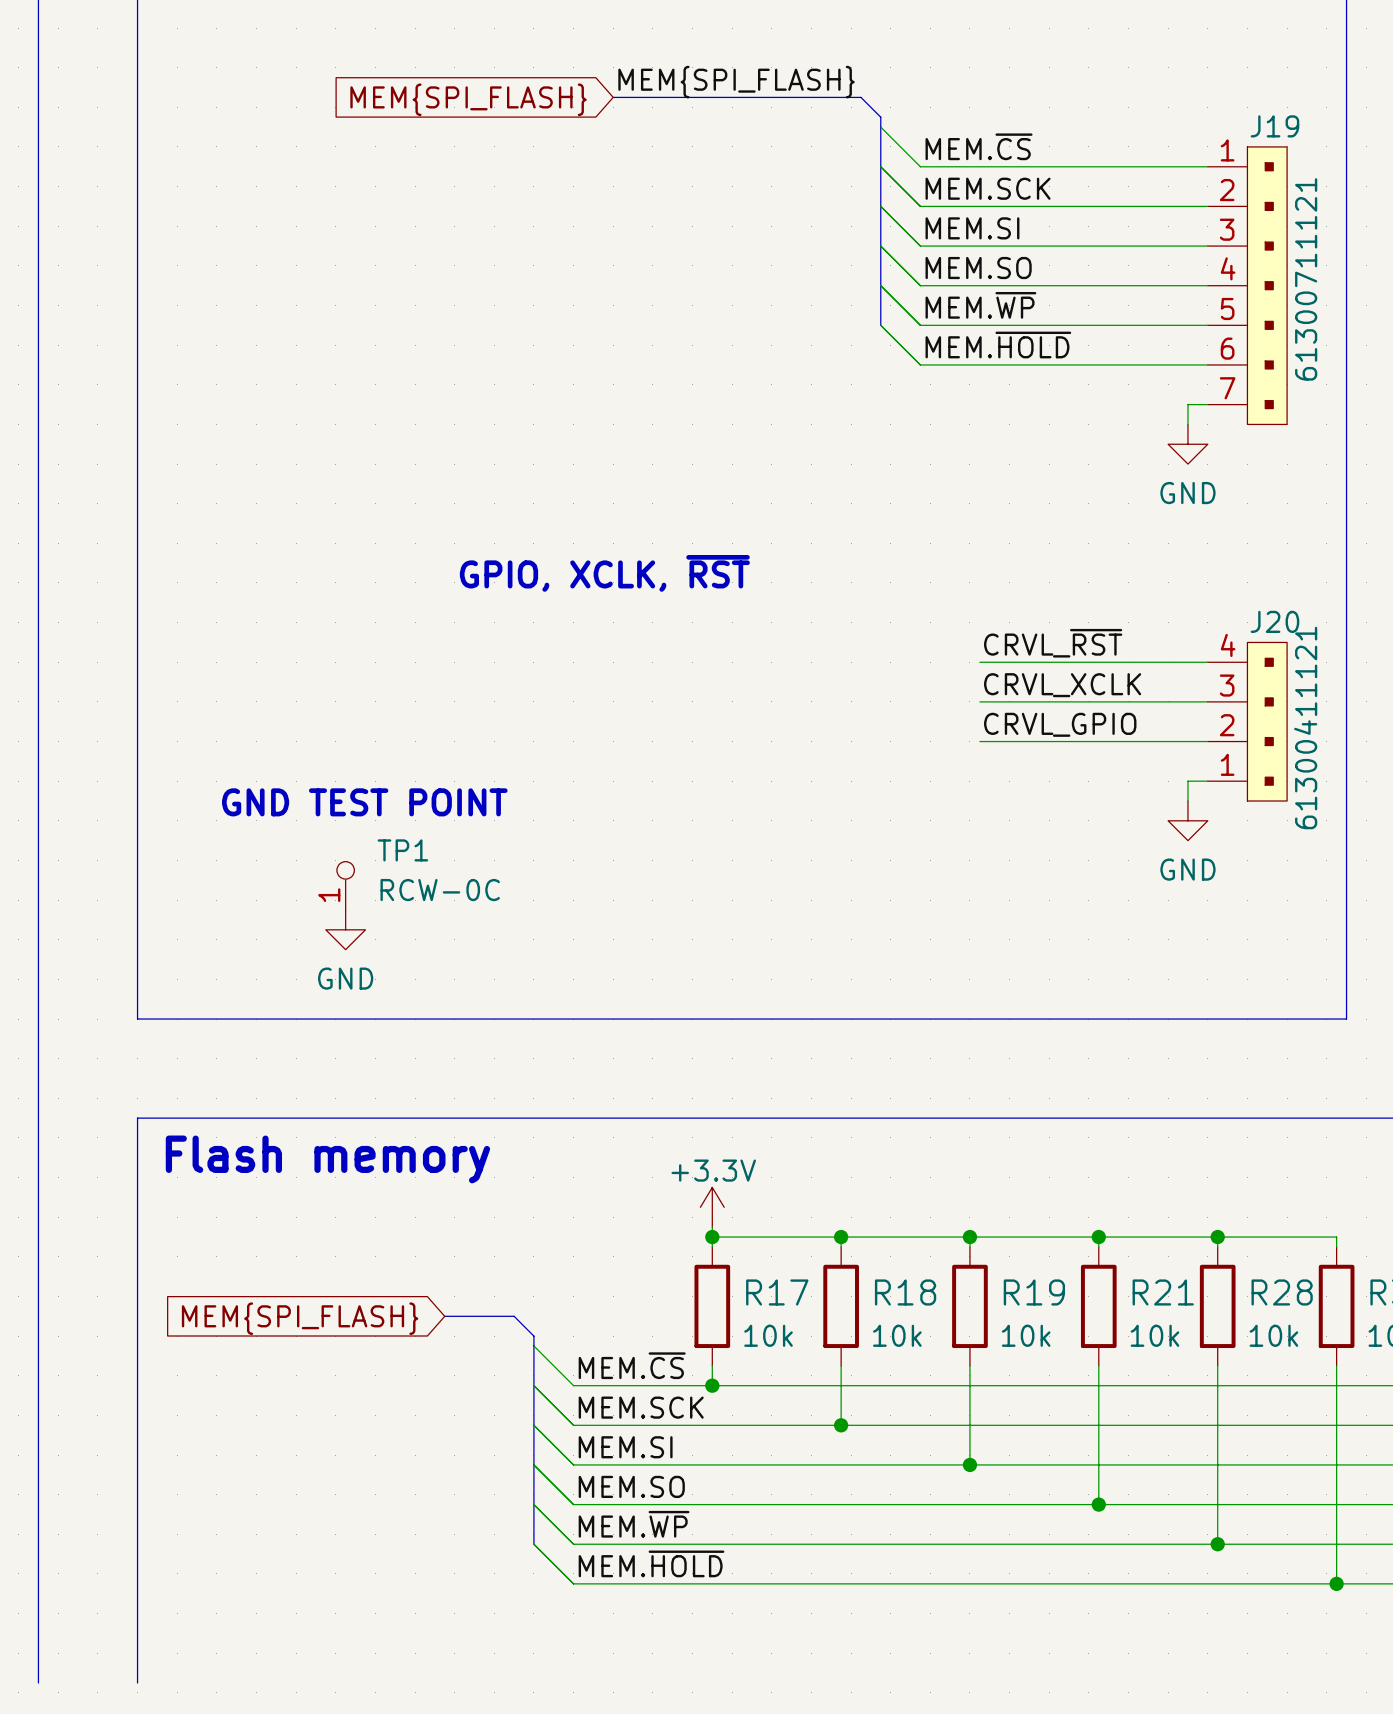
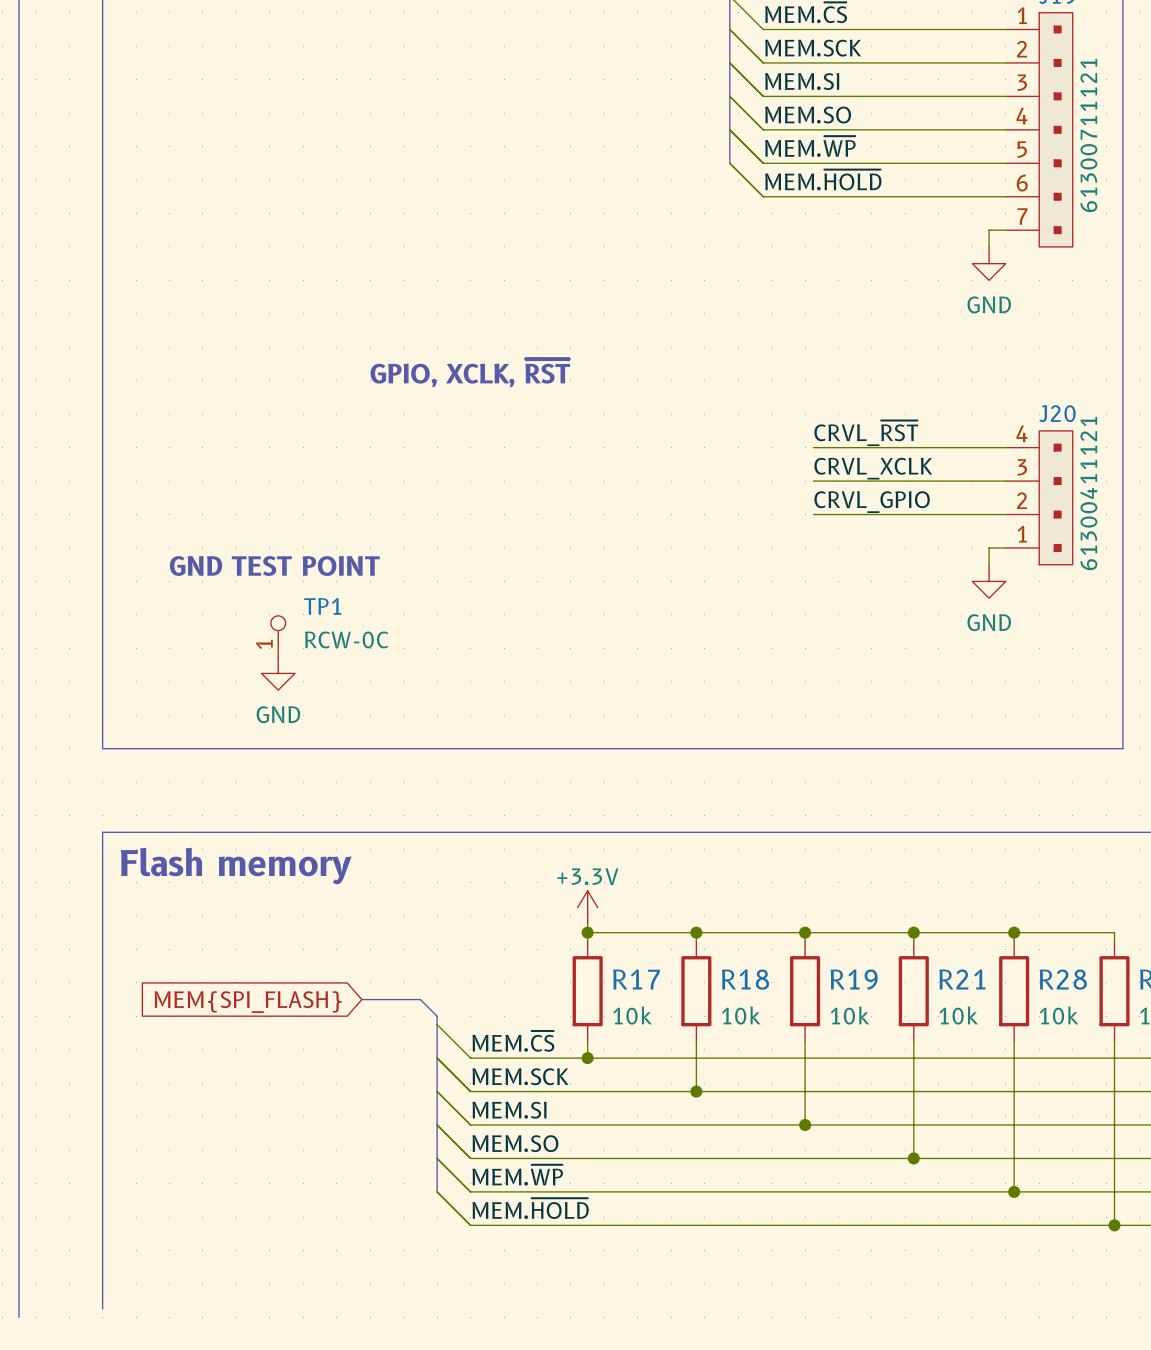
line: none -> (18, 1308) (18, 1317)

